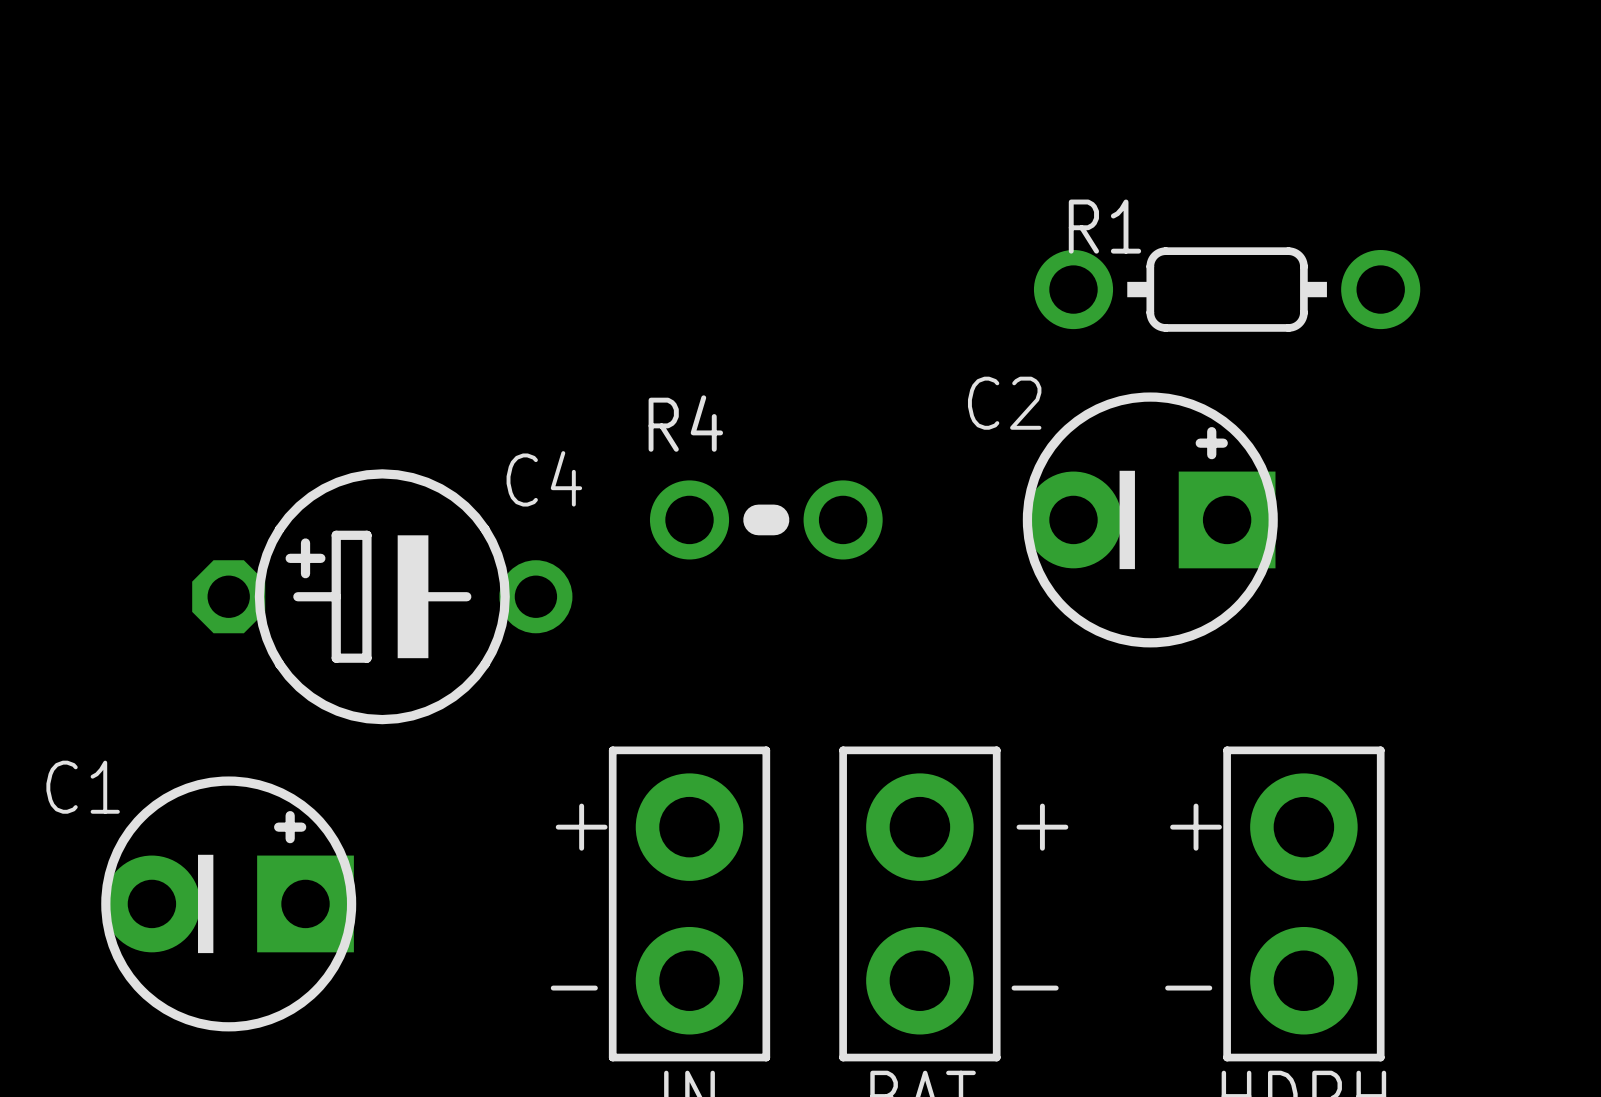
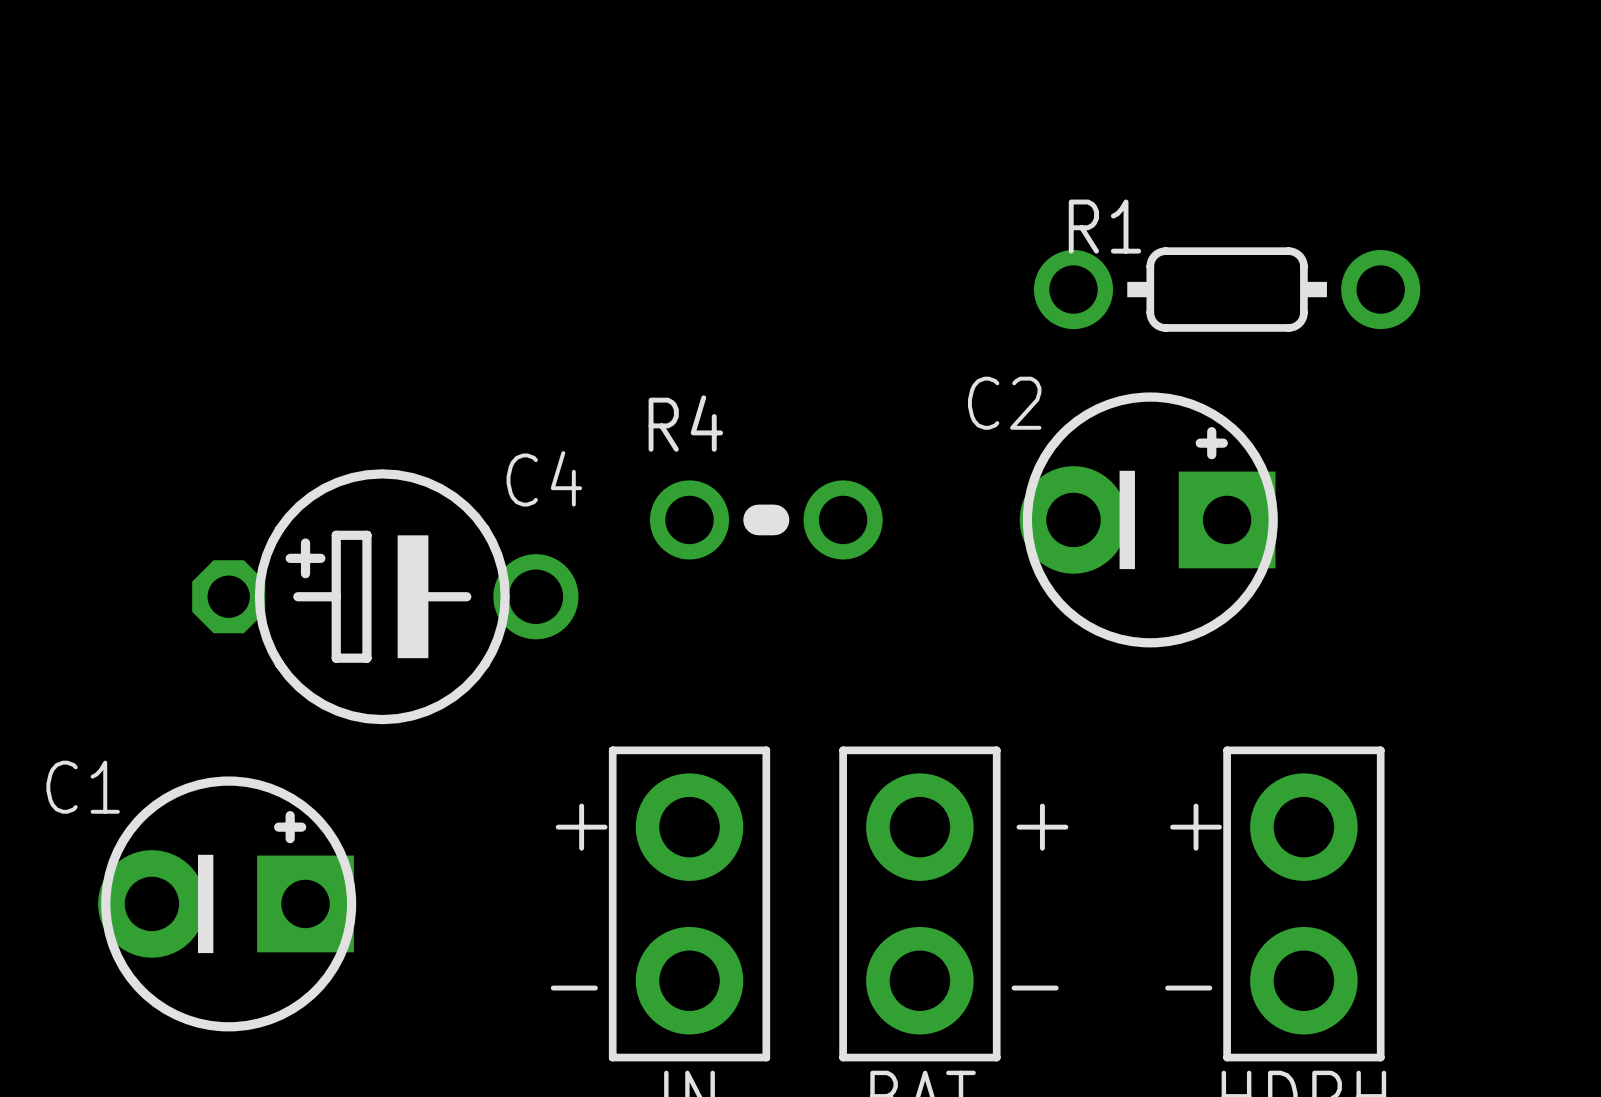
C2 footprint: [1022, 392, 1278, 648] -> [1019, 392, 1278, 648]
C4 footprint: [192, 469, 573, 725] -> [192, 469, 579, 725]
C1 footprint: [101, 776, 357, 1032] -> [98, 776, 357, 1032]

